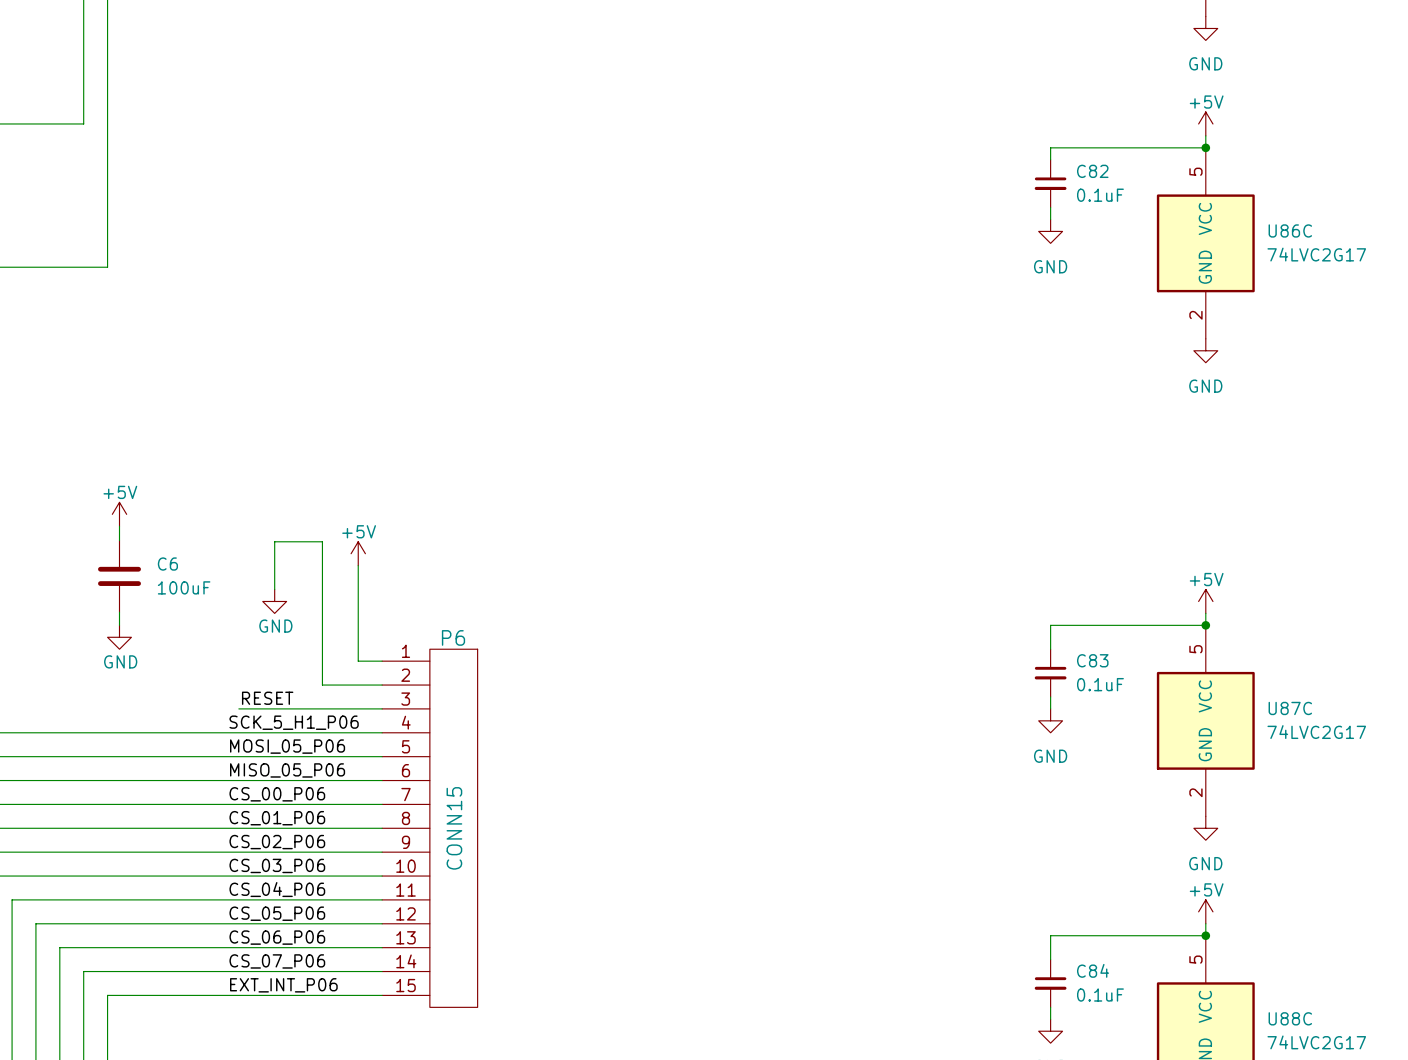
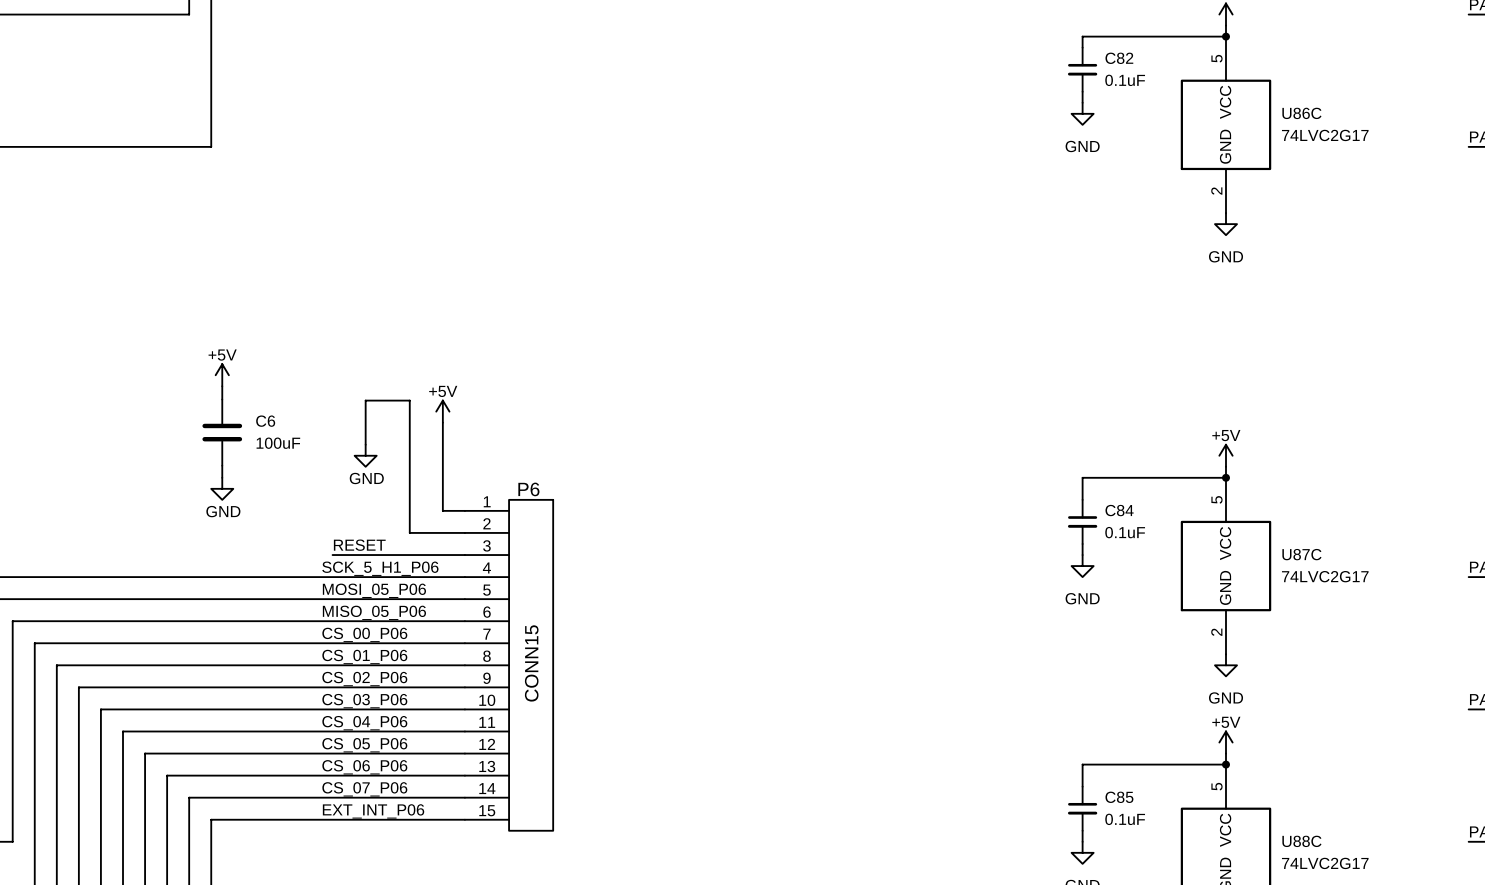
C83 name: C83 (1092, 660) -> C84 (1119, 510)
C84 name: C84 (1093, 970) -> C85 (1119, 797)

